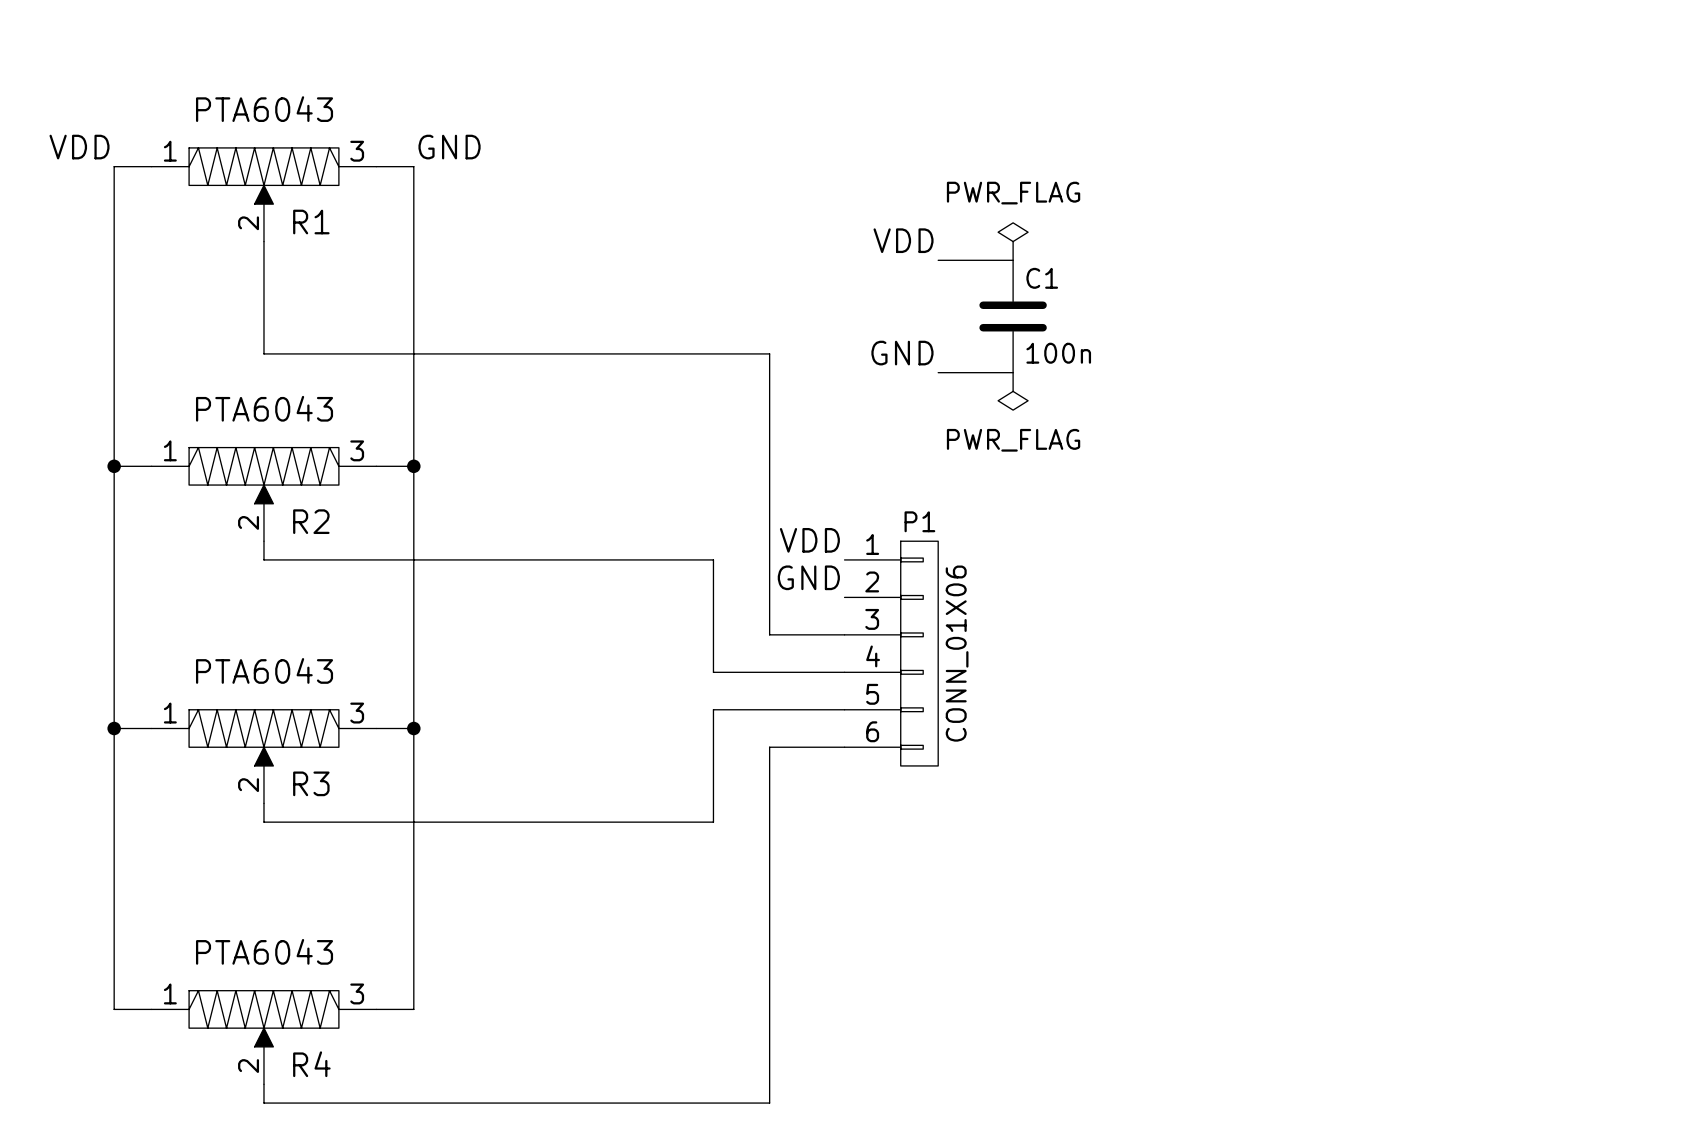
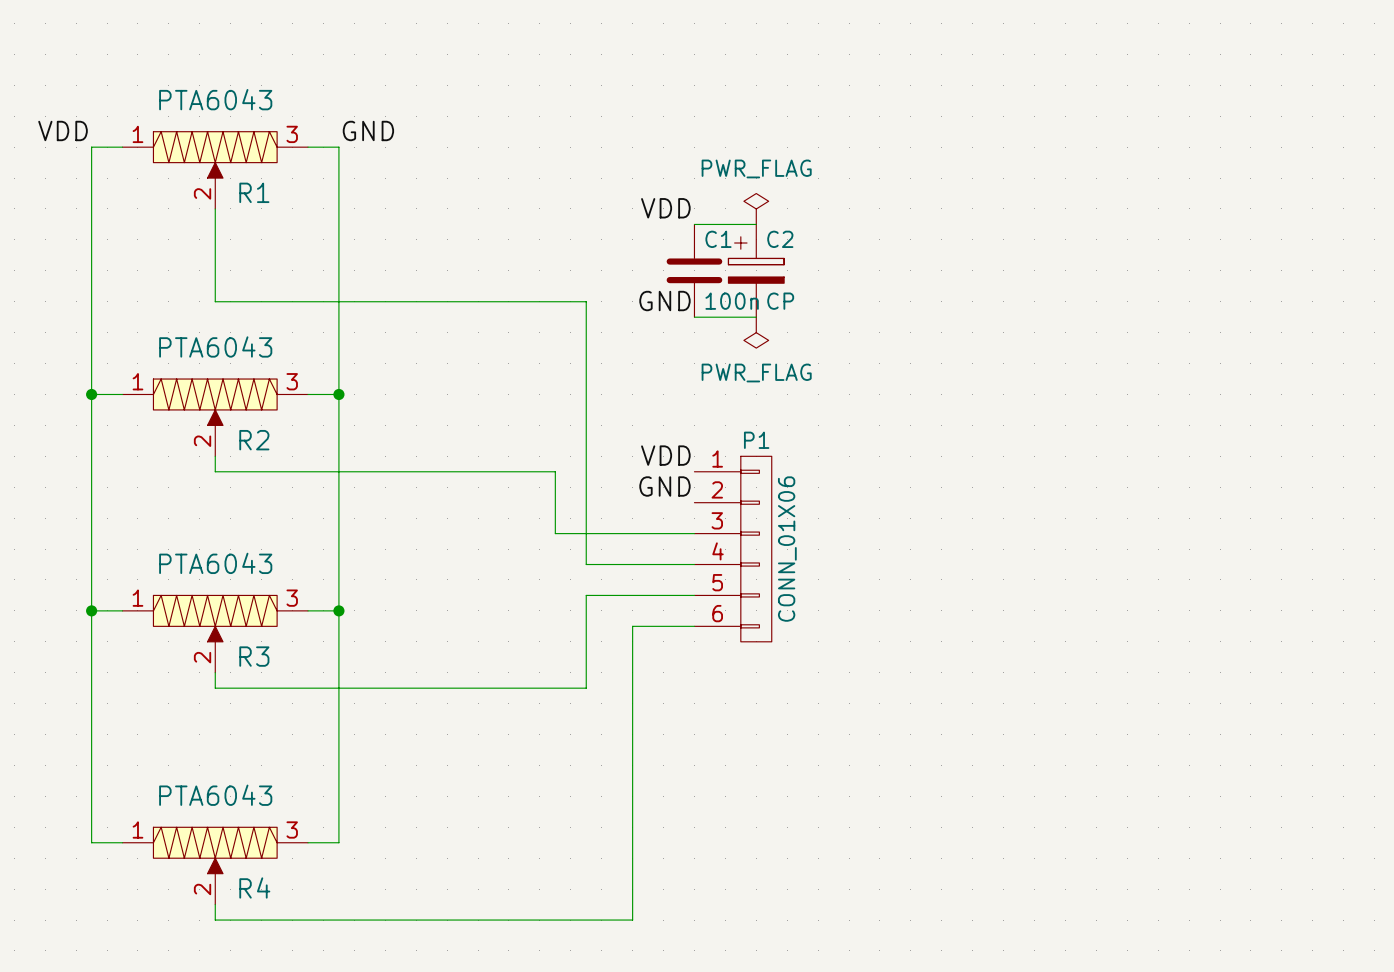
label position: VDD (903, 240) -> VDD (665, 208)
power symbol: none -> PWR_FLAG (756, 208)
power symbol: PWR_FLAG (1013, 241) -> none
wire: (938, 260) (1013, 260) -> (694, 224) (756, 224)
C2: none -> CP (756, 270)
C1 position: (1013, 316) -> (694, 270)
wire: (713, 353) (769, 353) (769, 634) -> (586, 301) (586, 471)
label position: GND (902, 353) -> GND (664, 301)
wire: (938, 372) (1013, 372) -> (694, 317) (756, 317)
power symbol: none -> PWR_FLAG (756, 332)
power symbol: PWR_FLAG (1013, 391) -> none
wire: (676, 559) (713, 559) -> (555, 471) (555, 533) (632, 533)

